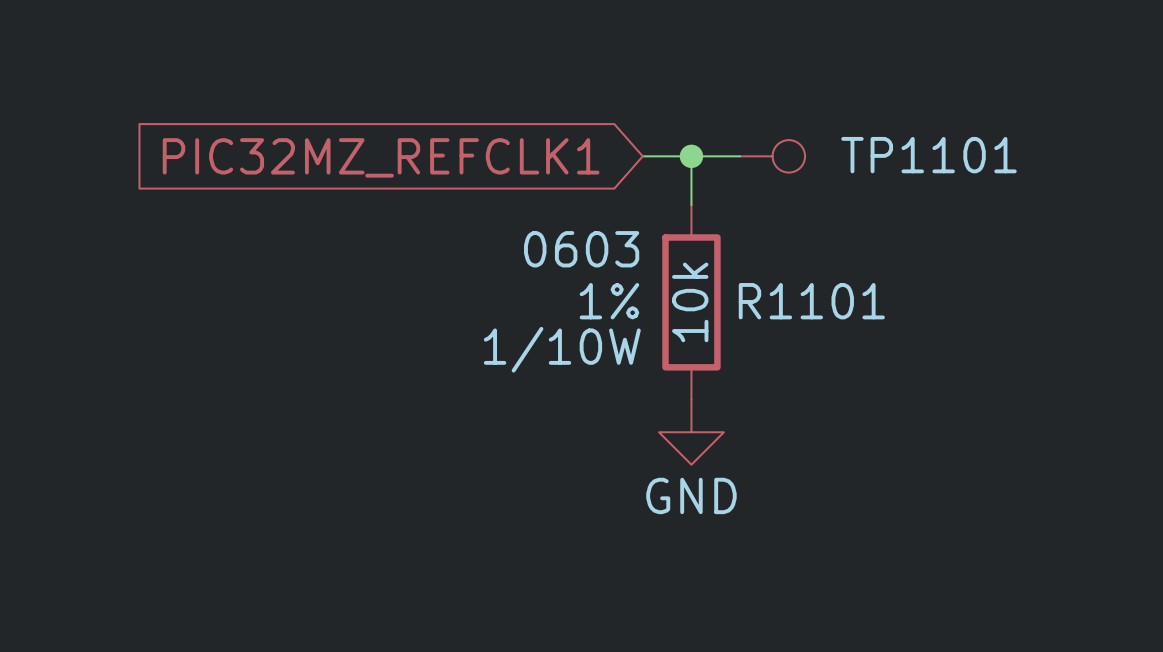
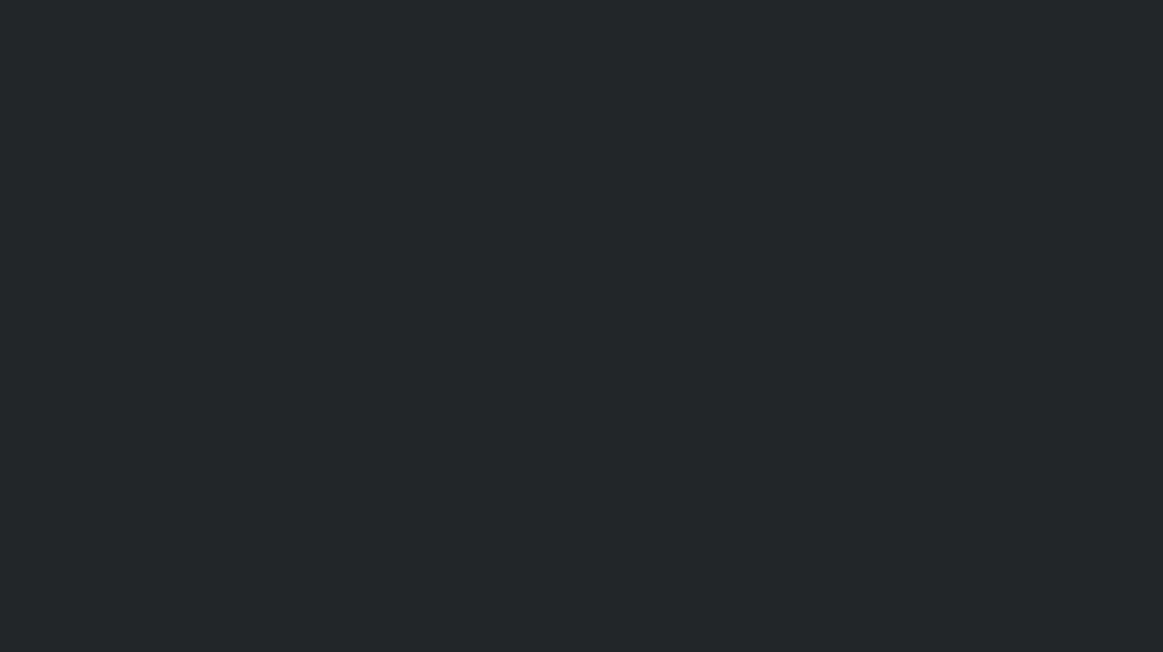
wire: (642, 156) (740, 156) -> none
wire: (691, 156) (691, 205) -> none
junction: (691, 156) -> none
TP1101: (772, 156) -> none
global label: PIC32MZ_REFCLK1 (381, 157) -> none
R1101: 10k (691, 302) -> none
power symbol: GND (691, 432) -> none

